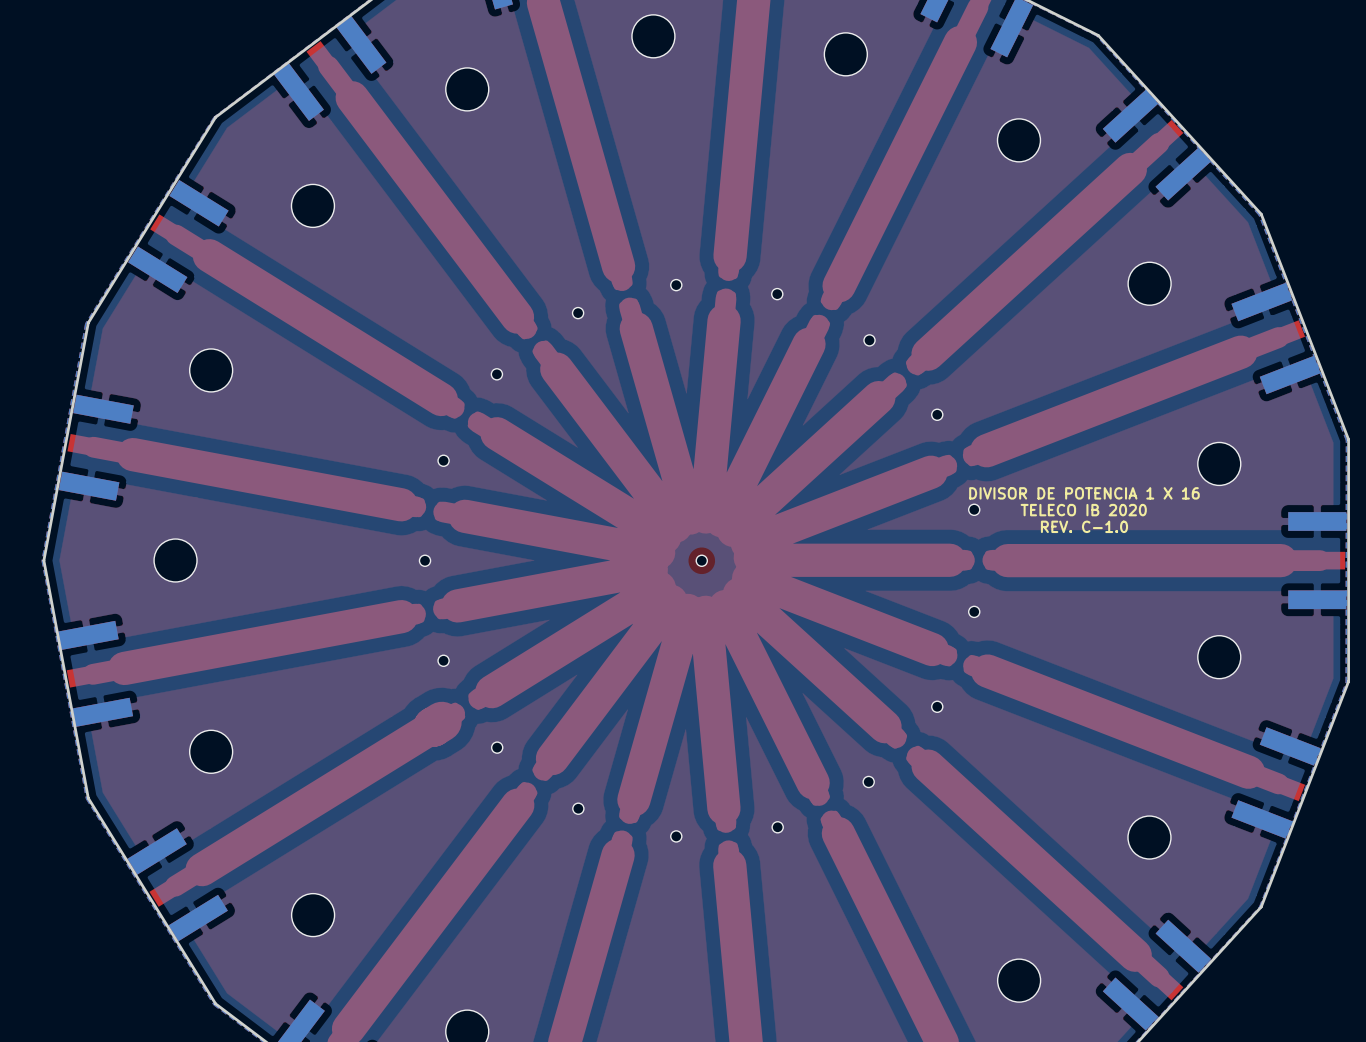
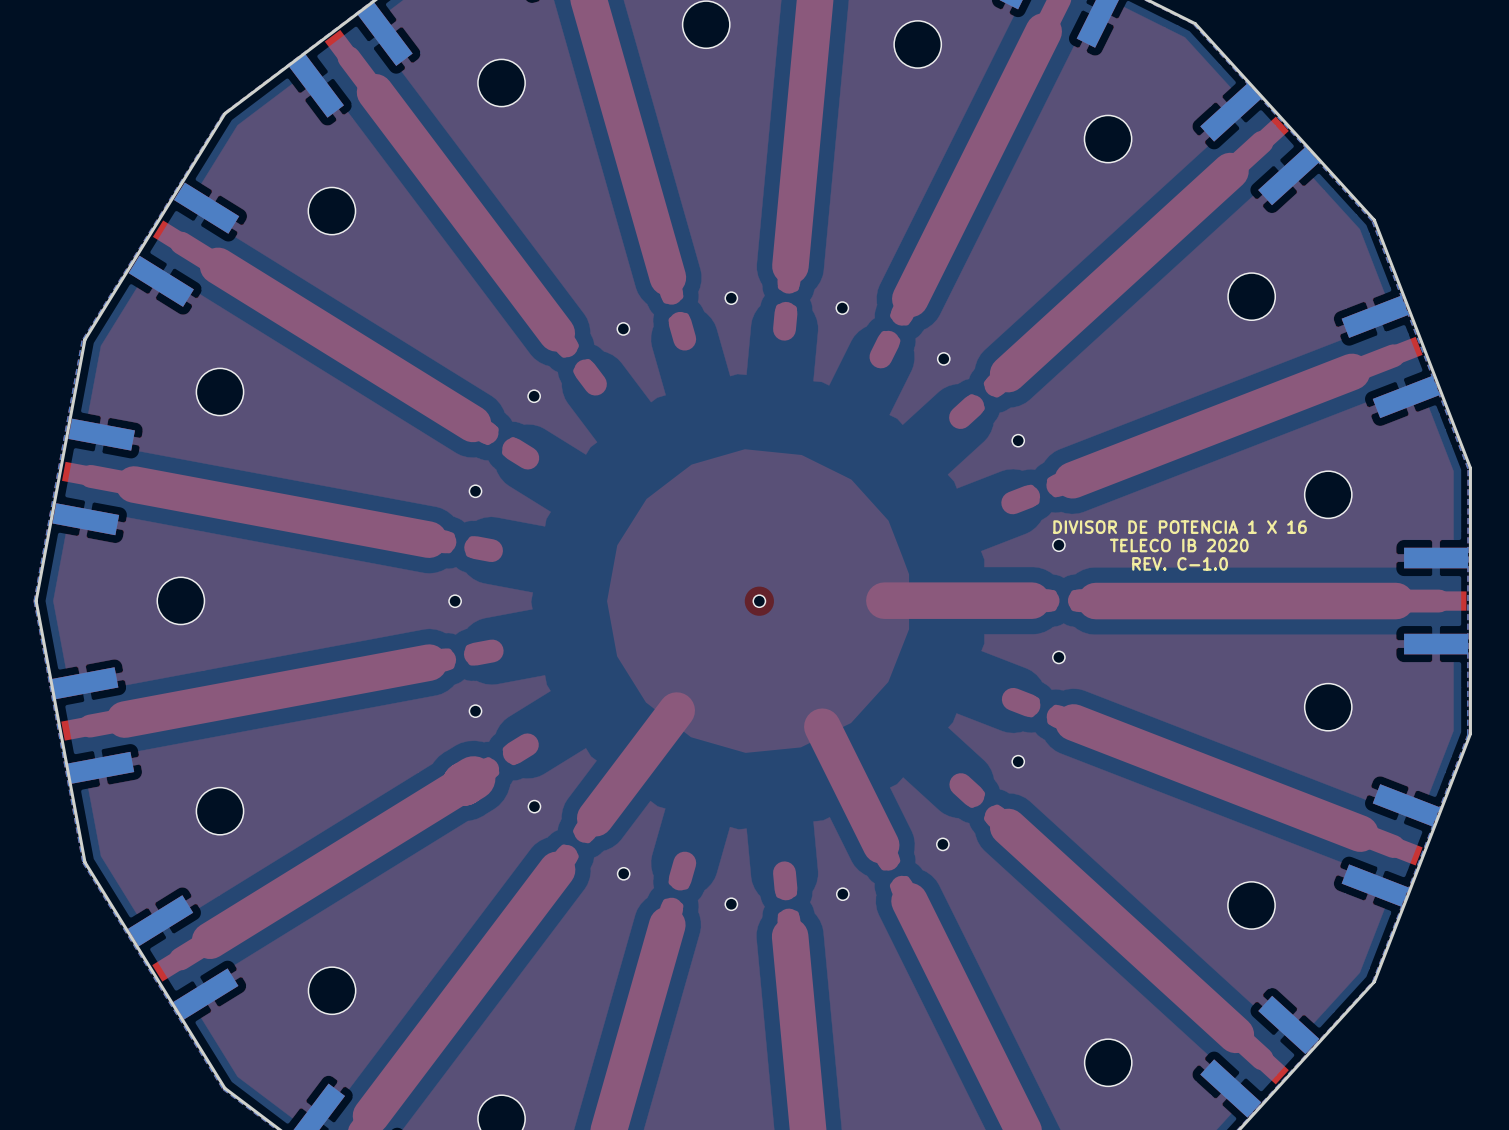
top track: (724, 320) (705, 517) -> none
top track: (636, 328) (690, 518) -> none
top track: (808, 344) (721, 520) -> none
top track: (556, 369) (675, 526) -> none
top track: (878, 397) (733, 530) -> none
top track: (497, 433) (664, 537) -> none
top track: (931, 472) (747, 543) -> none
top track: (465, 516) (658, 552) -> none
top track: (750, 557) (752, 560) (815, 560) -> none
top track: (651, 569) (457, 605) -> none
top track: (748, 578) (932, 649) -> none
top track: (659, 587) (491, 691) -> none
top track: (739, 594) (885, 726) -> none
top track: (671, 601) (552, 758) -> (676, 710) (595, 818)
top track: (725, 606) (813, 782) -> (822, 726) (881, 845)
top track: (687, 610) (633, 799) -> none
top track: (705, 612) (723, 808) -> none

